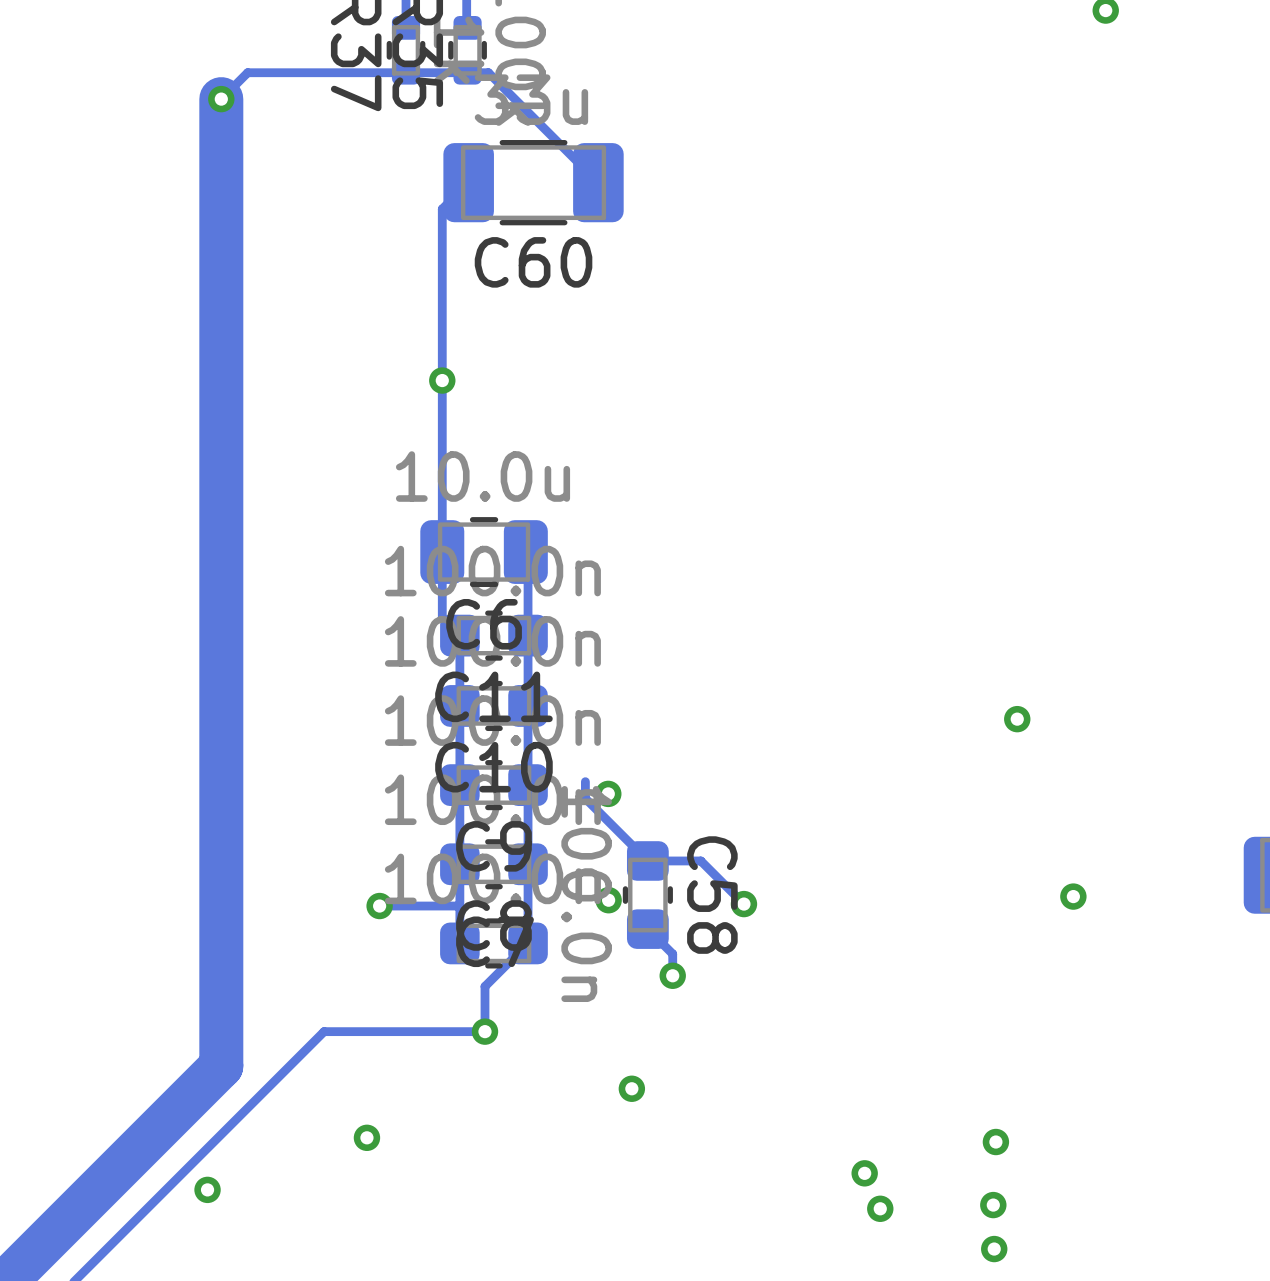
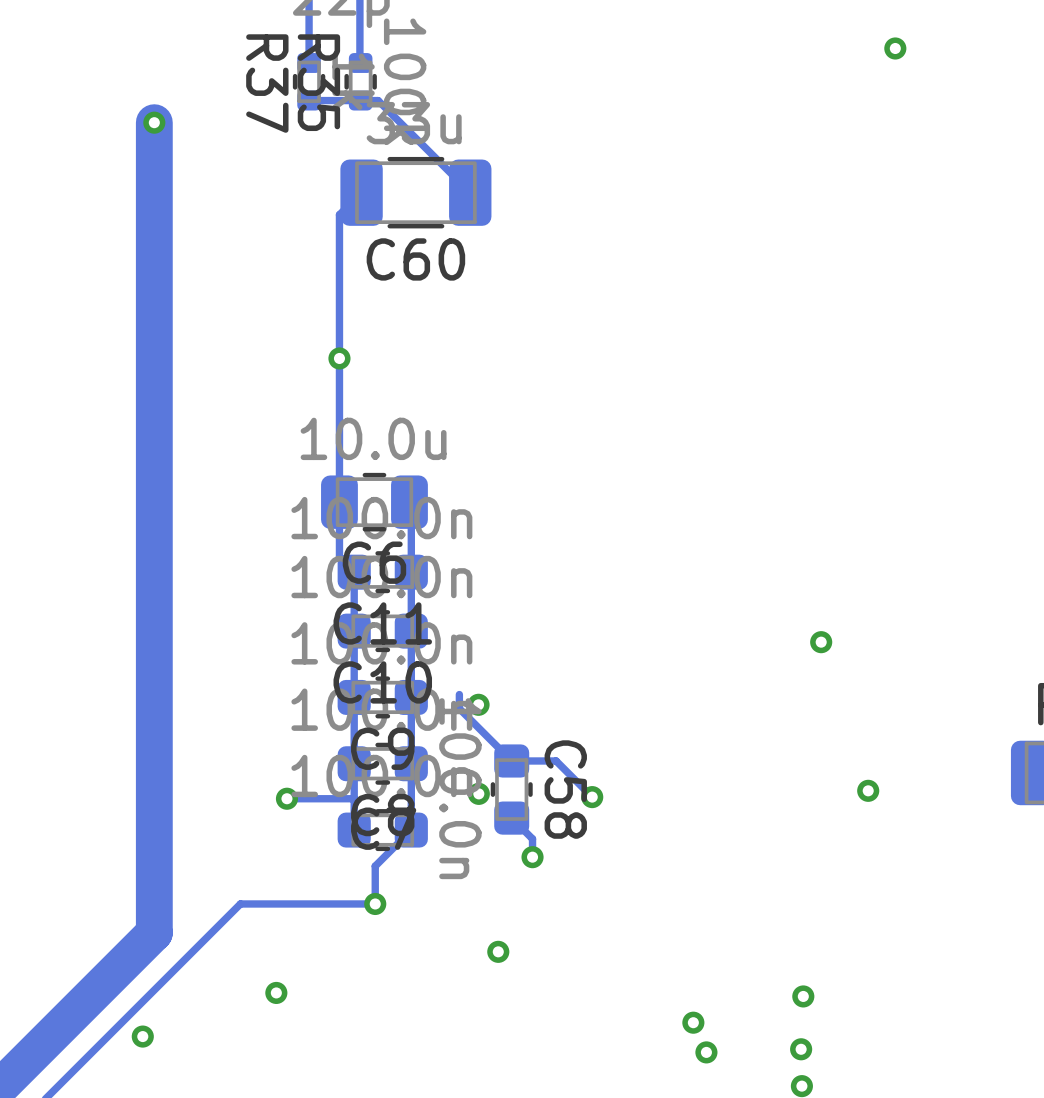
track: (406, 72) (247, 72) (221, 99) -> none

